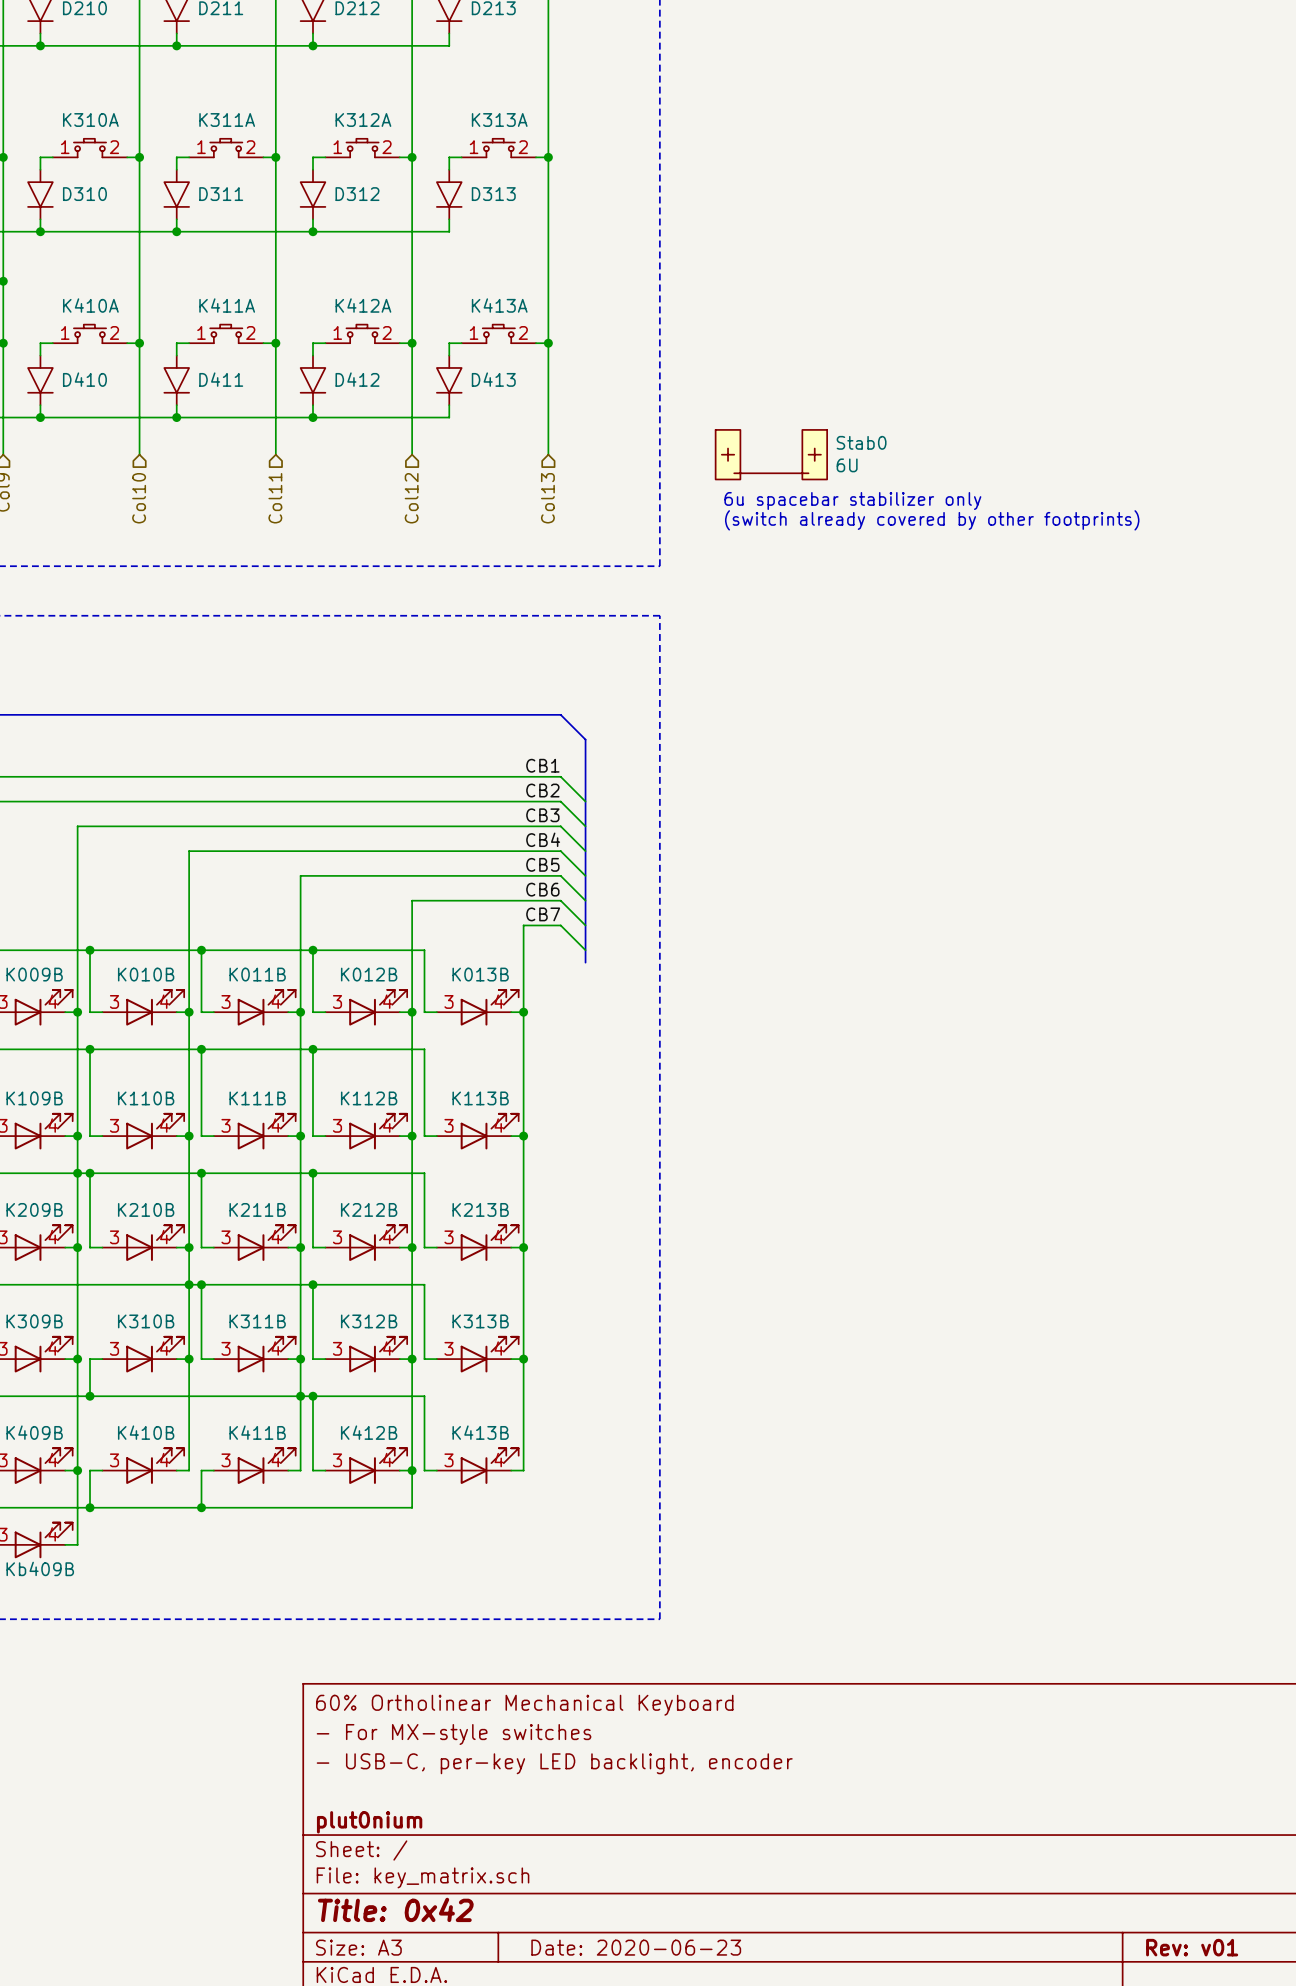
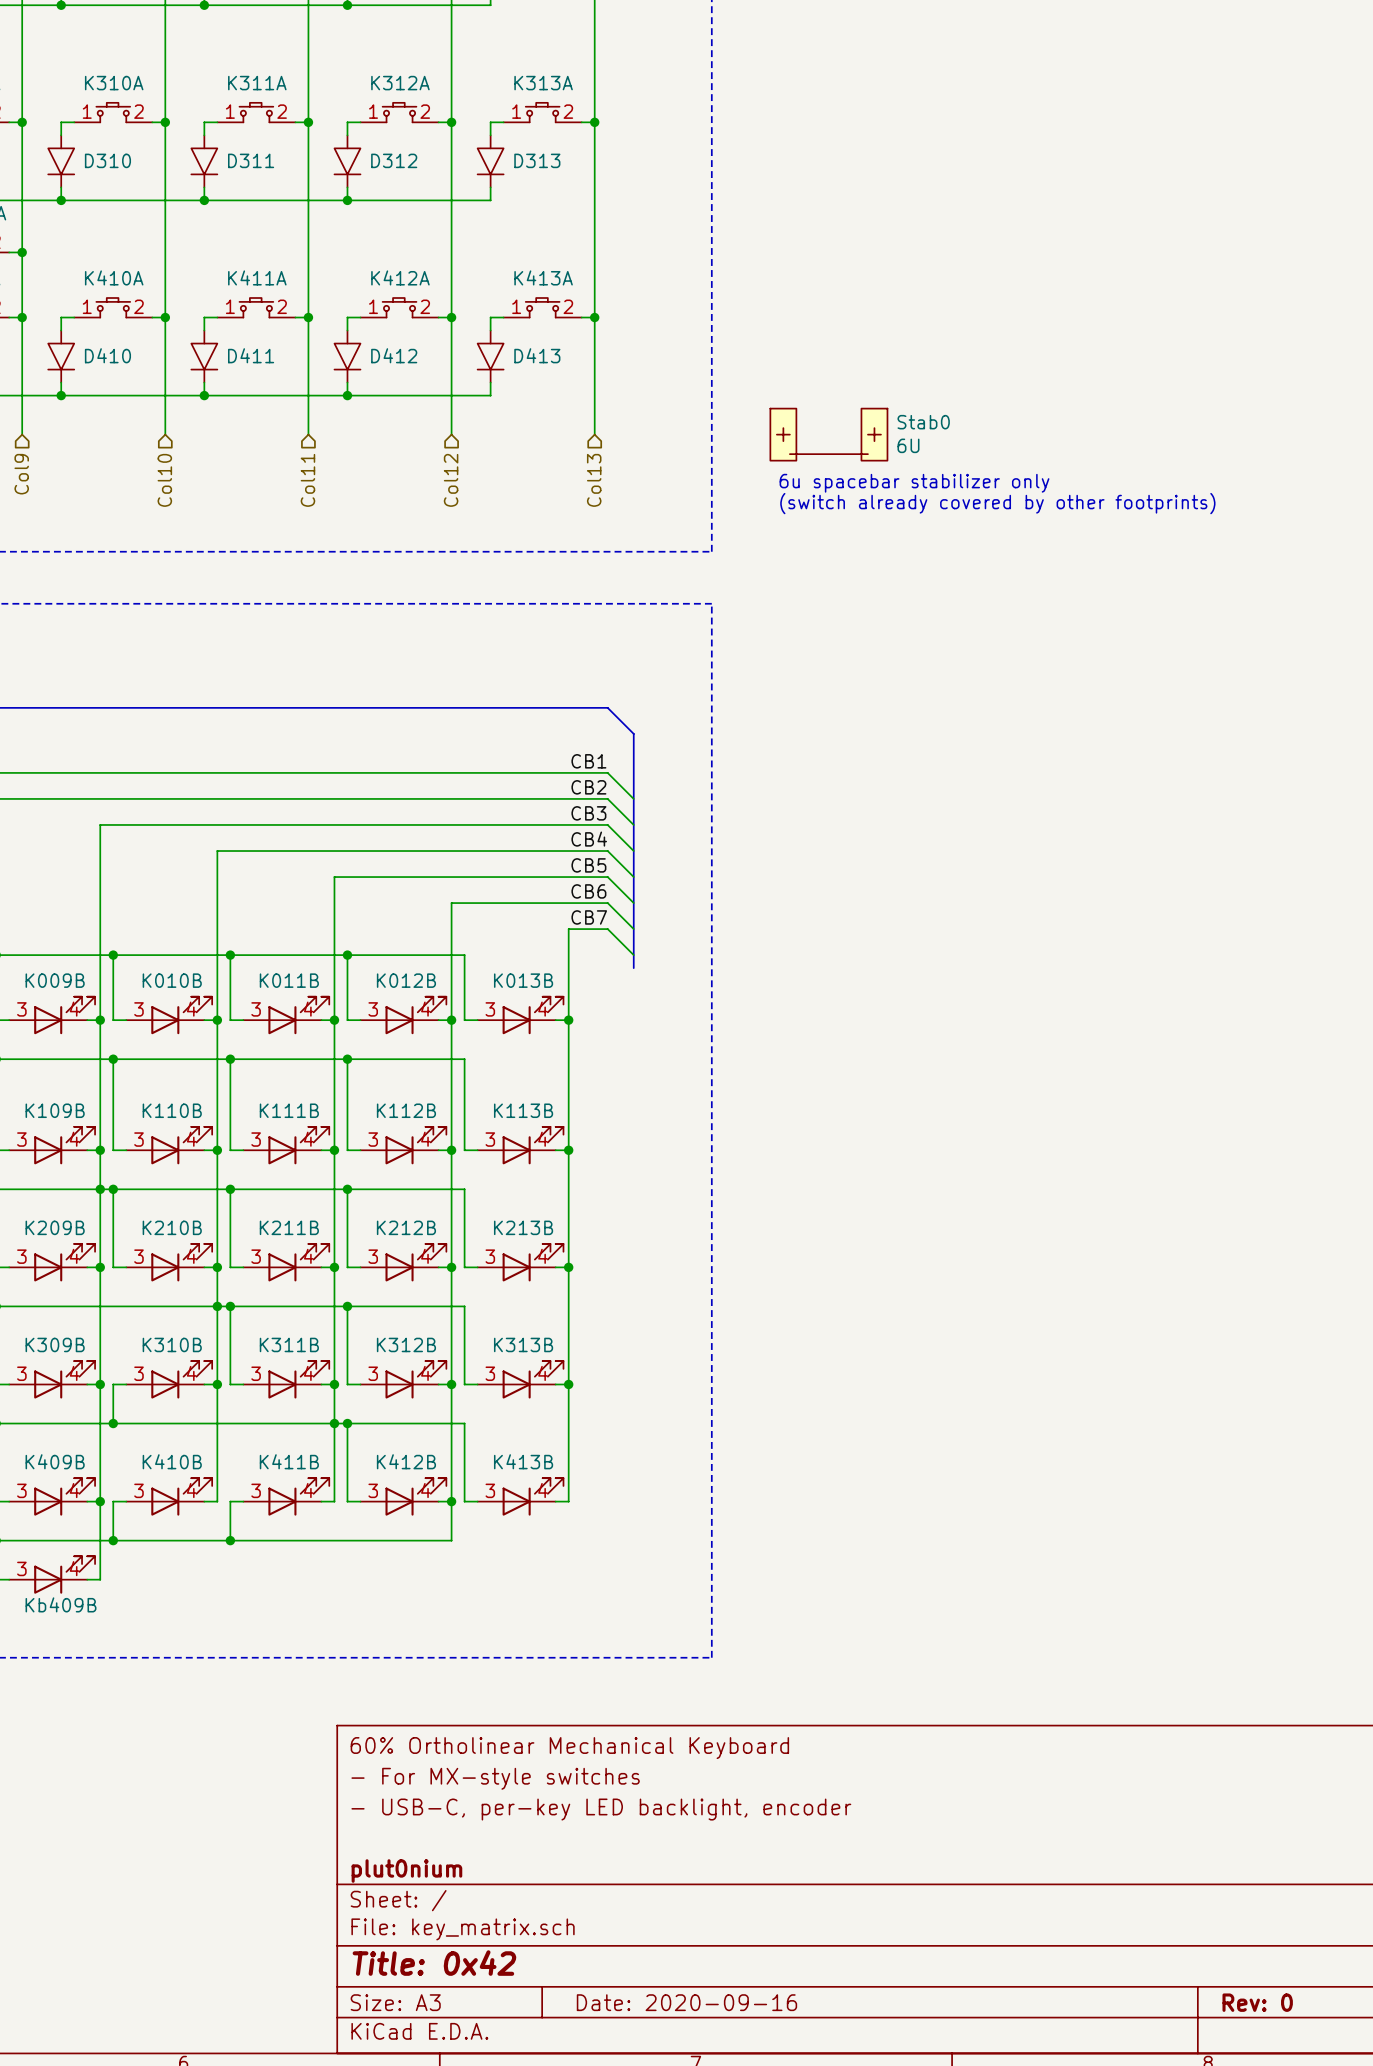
title block: Date: 2020-06-23 (636, 1947) -> Date: 2020-09-16 (686, 2002)
title block: Rev: v01 (1192, 1947) -> Rev: 0 (1257, 2002)

